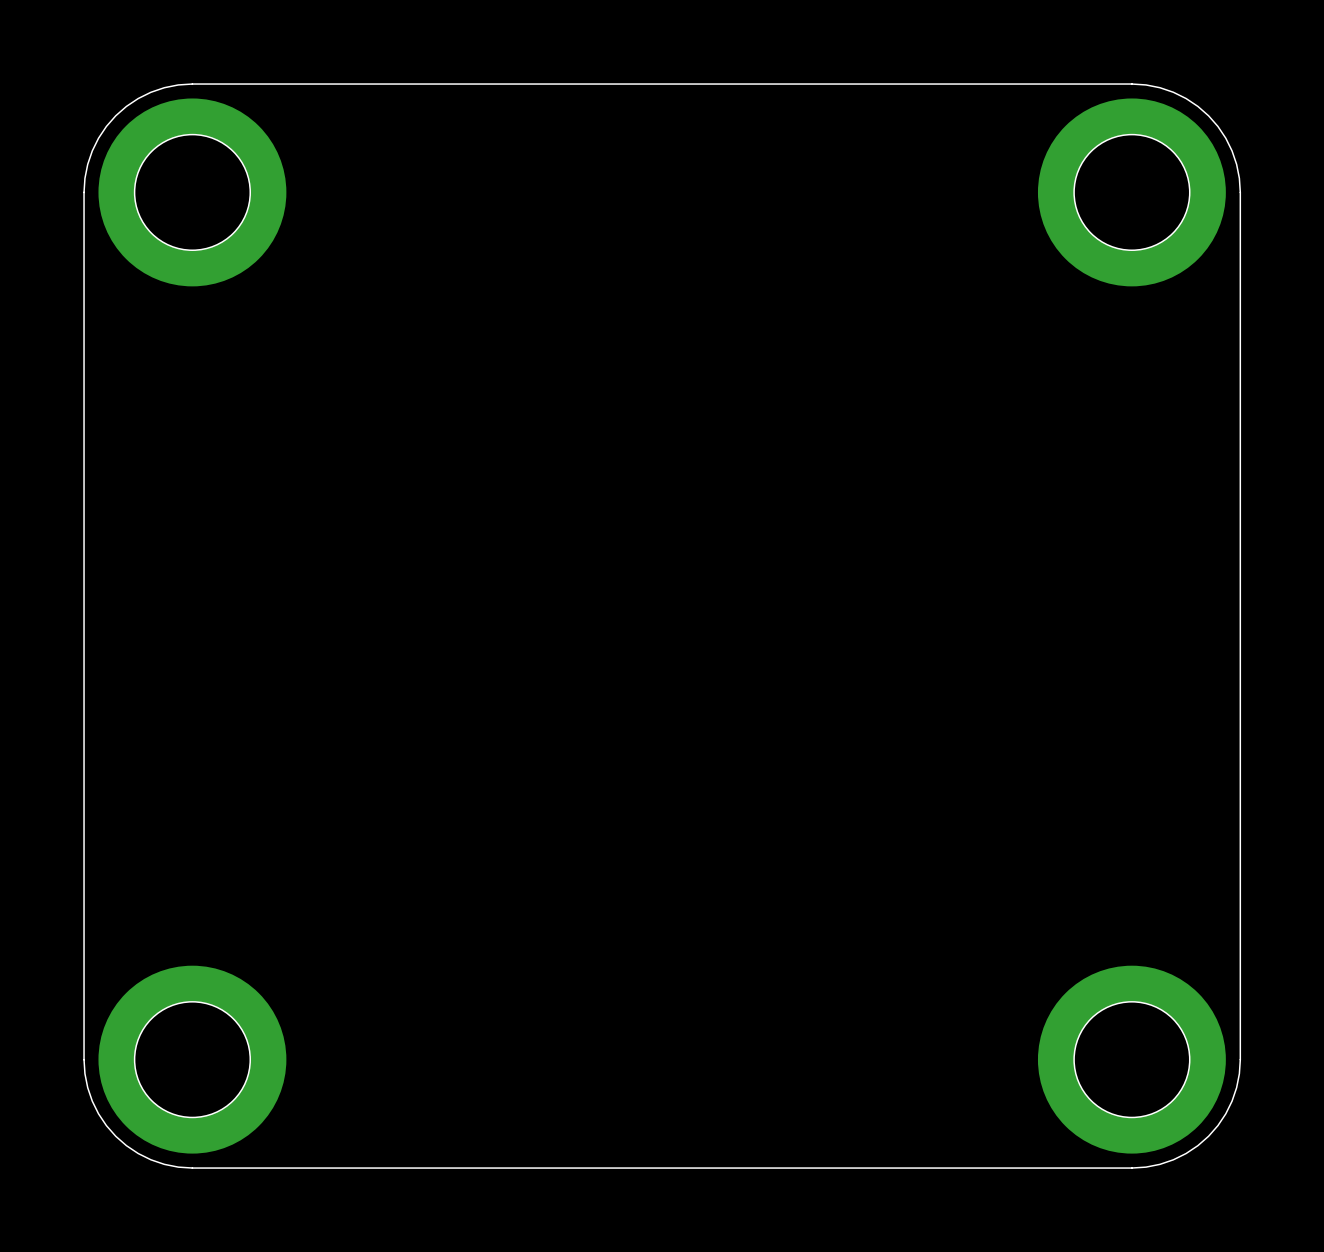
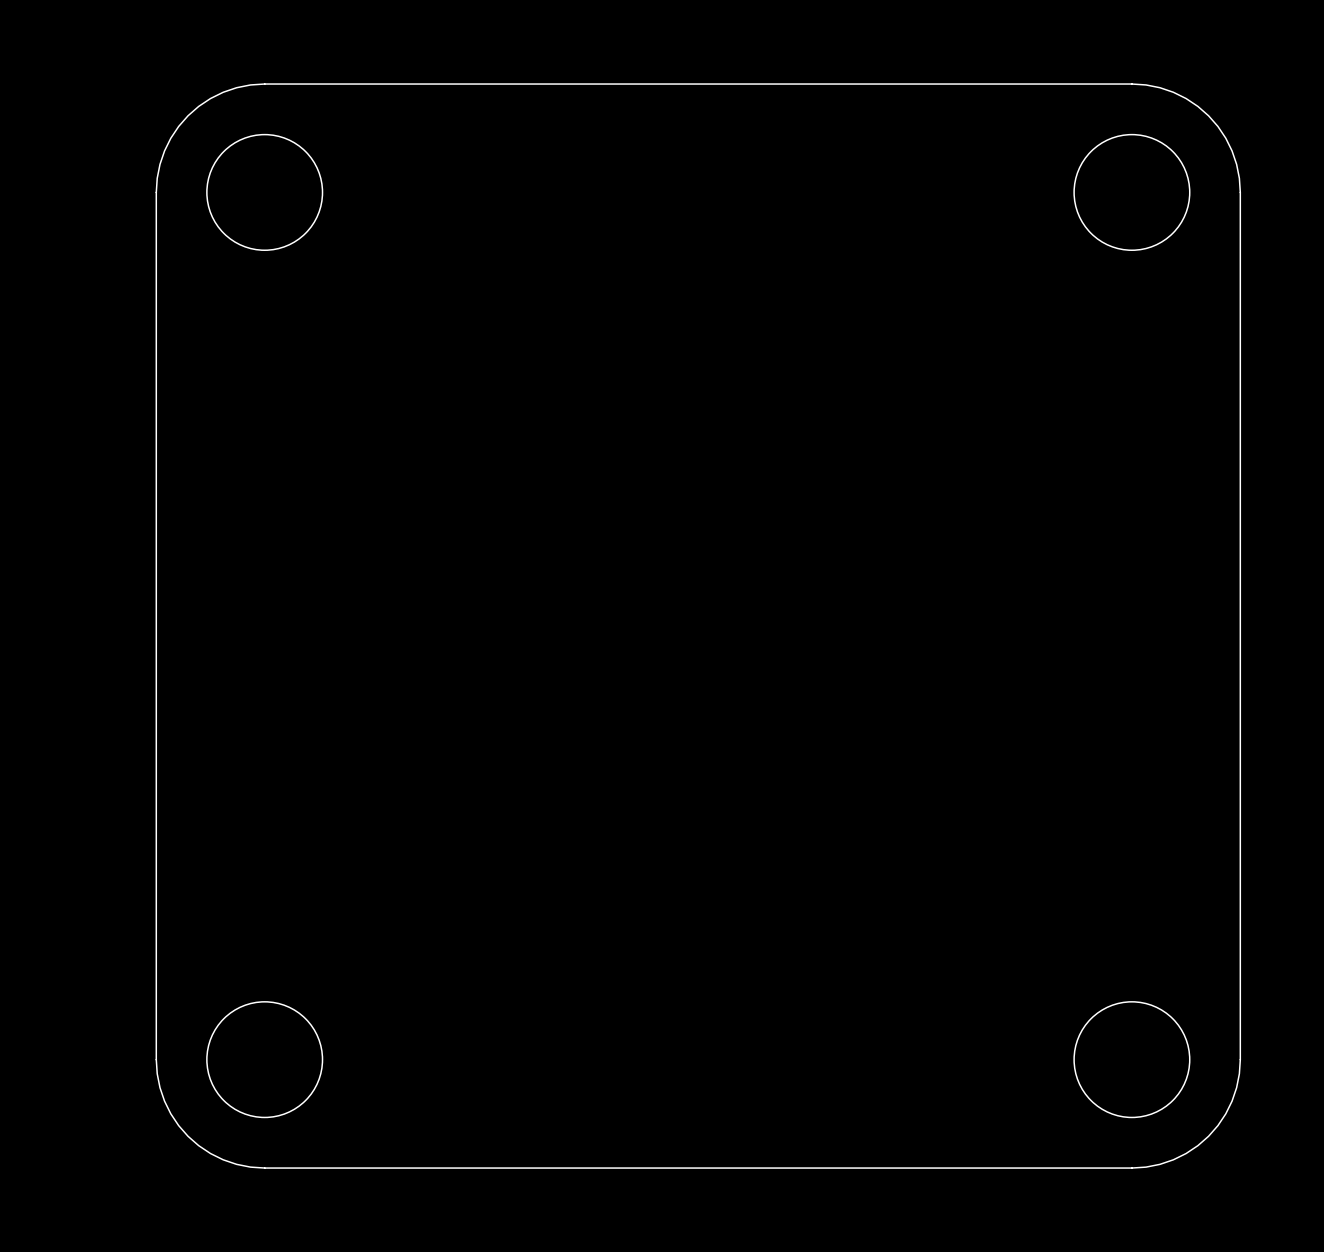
board edge: (264, 84) (178, 84) (164, 87) (138, 98) (115, 115) (98, 138) (87, 164) (84, 192) (84, 1073) (92, 1101) (106, 1125) (126, 1145) (138, 1153) (164, 1164) (178, 1167) (264, 1168) -> (264, 84) (236, 87) (223, 92) (198, 106) (188, 115) (178, 126) (164, 150) (159, 164) (156, 192) (157, 1073) (159, 1087) (170, 1113) (178, 1125) (198, 1145) (210, 1153) (236, 1164) (264, 1168)
round board edge position: (192, 192) -> (264, 192)
part: (192, 192) -> none
part: (1131, 192) -> none
round board edge position: (192, 1059) -> (264, 1059)
part: (192, 1059) -> none
part: (1131, 1059) -> none

